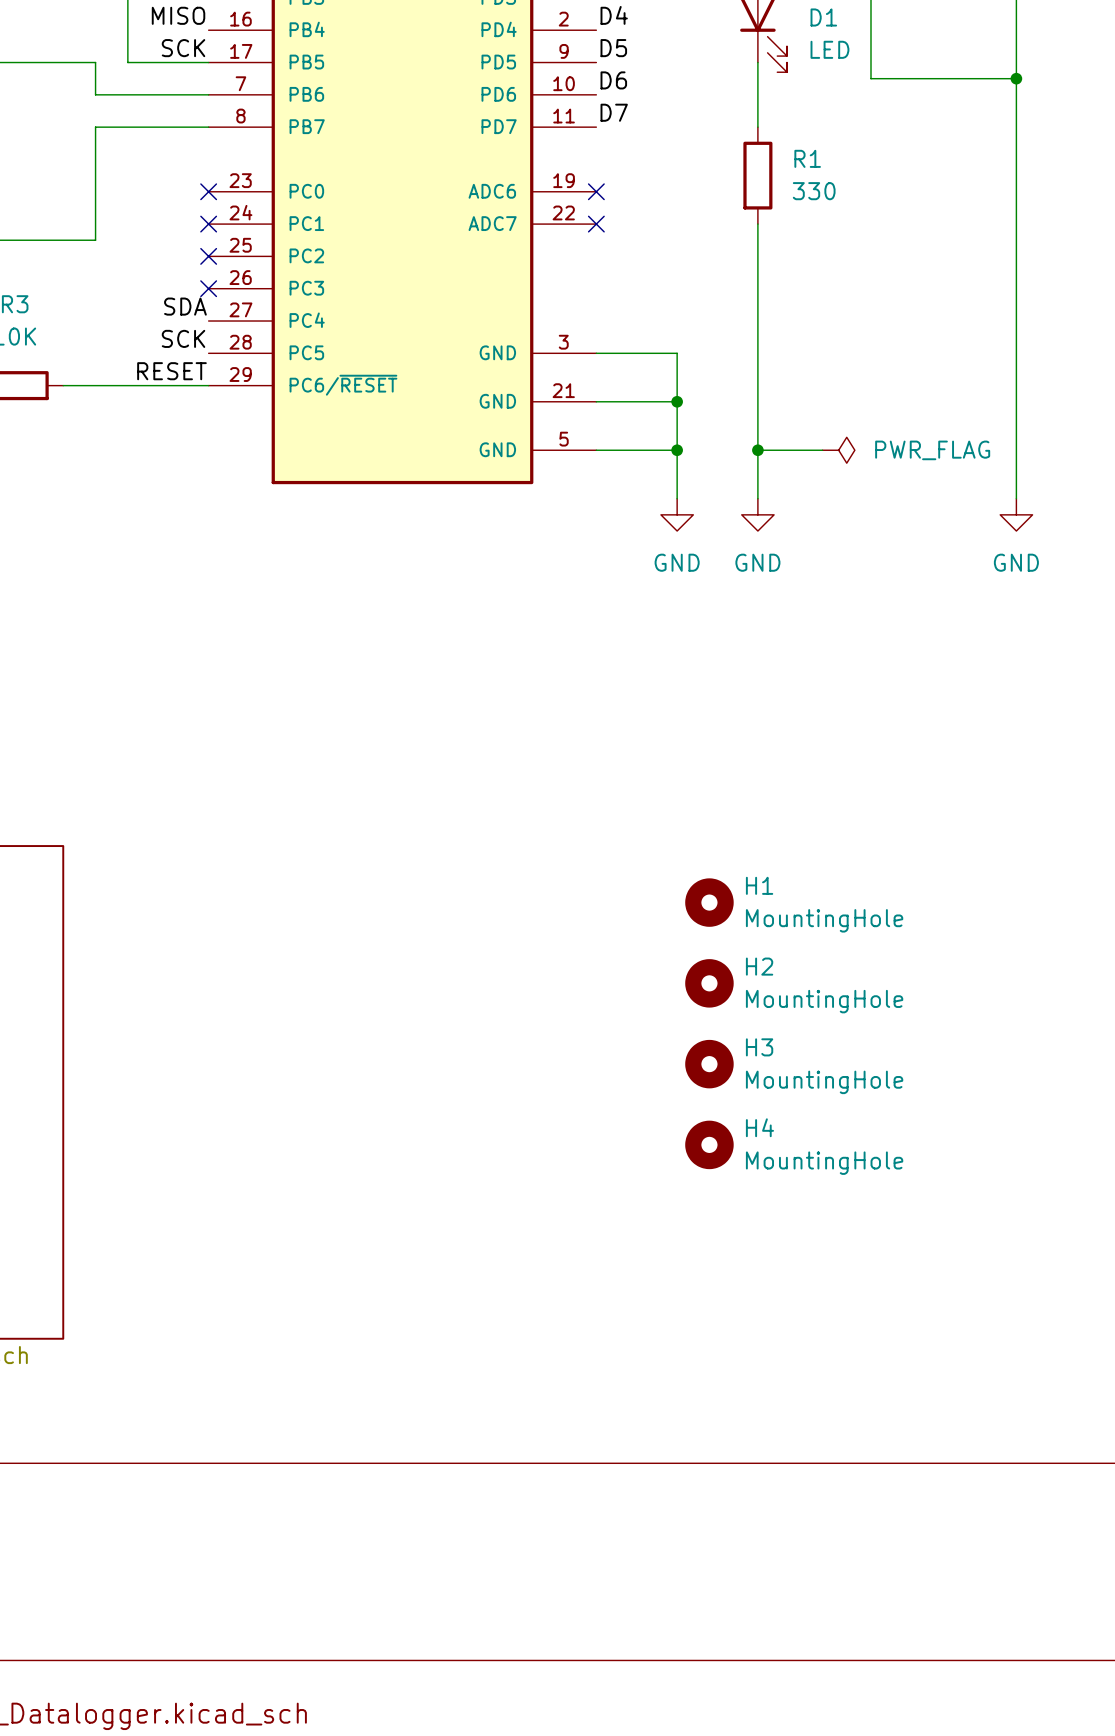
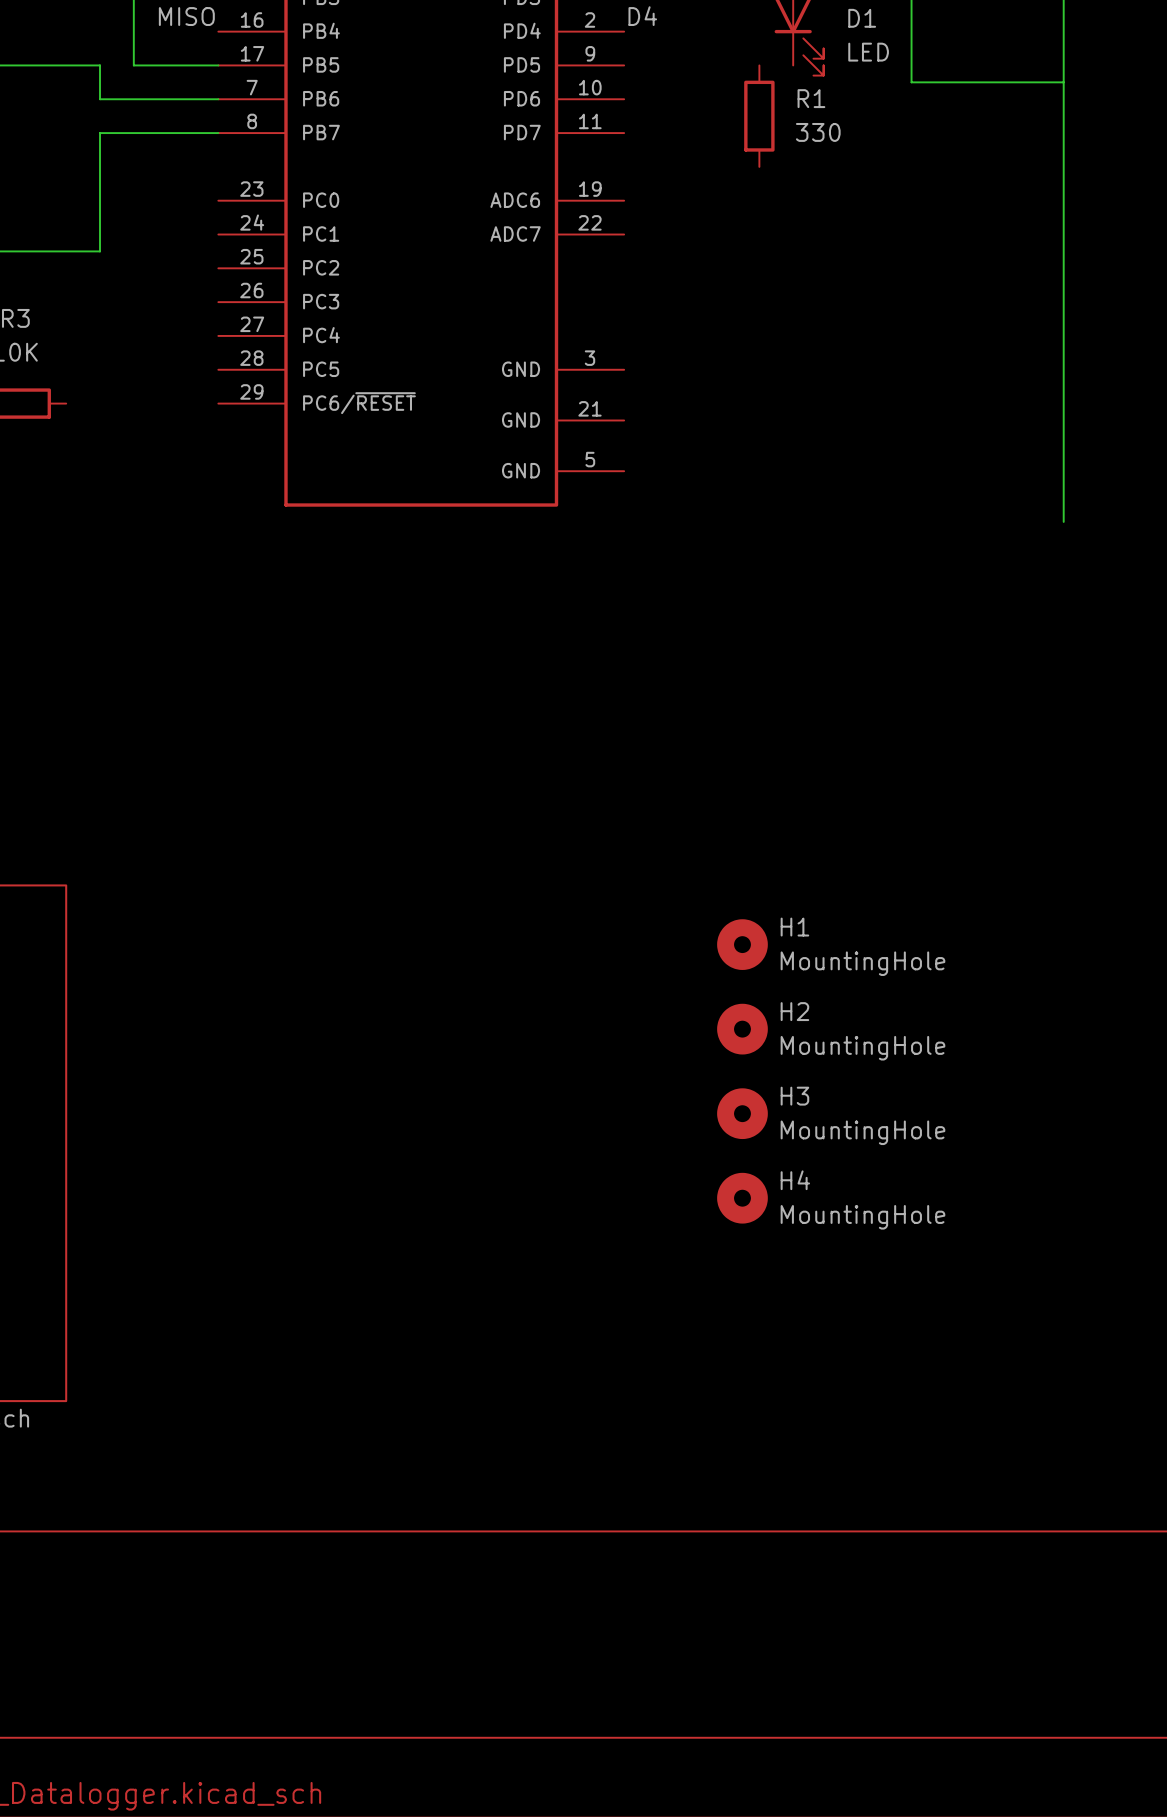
label: SCK (183, 48) -> none
label: D5 (613, 48) -> none
wire: (757, 62) (757, 127) -> none
junction: (1016, 78) -> none
label: D6 (613, 80) -> none
label: D7 (614, 112) -> none
R1 position: (757, 175) -> (759, 116)
no-connect mark: (208, 191) -> none
no-connect mark: (596, 191) -> none
no-connect mark: (208, 224) -> none
no-connect mark: (596, 224) -> none
wire: (757, 224) (757, 498) -> none
no-connect mark: (208, 256) -> none
no-connect mark: (208, 288) -> none
label: SDA (185, 306) -> none
label: SCK (183, 338) -> none
wire: (596, 353) (677, 353) (677, 498) -> none
label: RESET (171, 371) -> none
wire: (63, 385) (208, 385) -> none
wire: (596, 401) (677, 401) -> none
junction: (677, 401) -> none
wire: (596, 450) (677, 450) -> none
junction: (677, 450) -> none
wire: (757, 450) (822, 450) -> none
junction: (757, 450) -> none
power symbol: PWR_FLAG (838, 450) -> none
power symbol: GND (677, 514) -> none
power symbol: GND (757, 514) -> none
power symbol: GND (1016, 514) -> none

